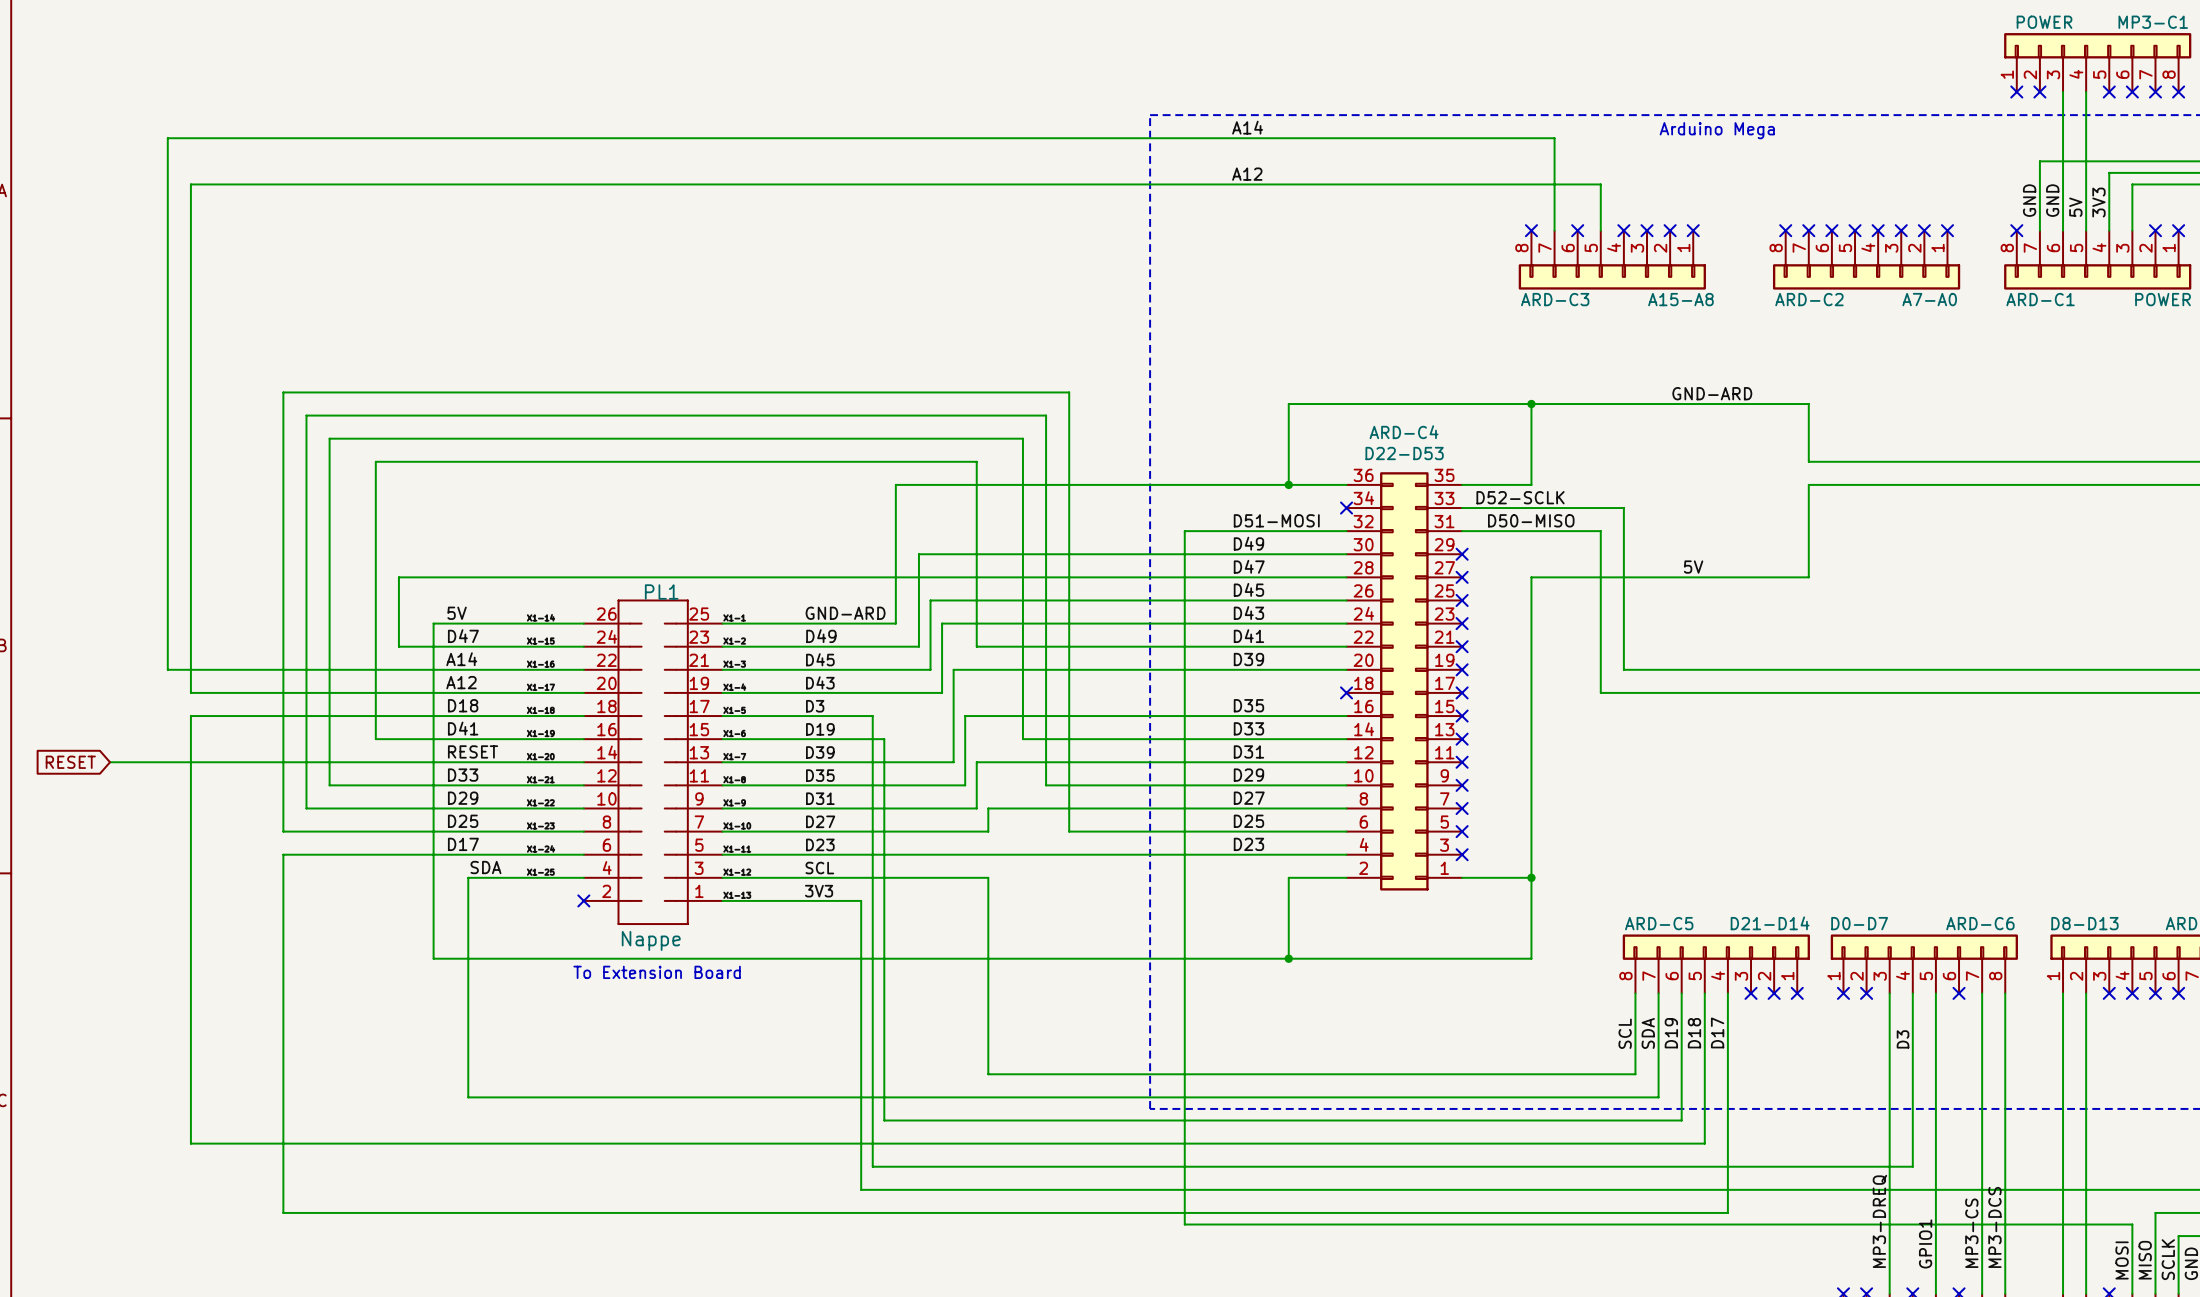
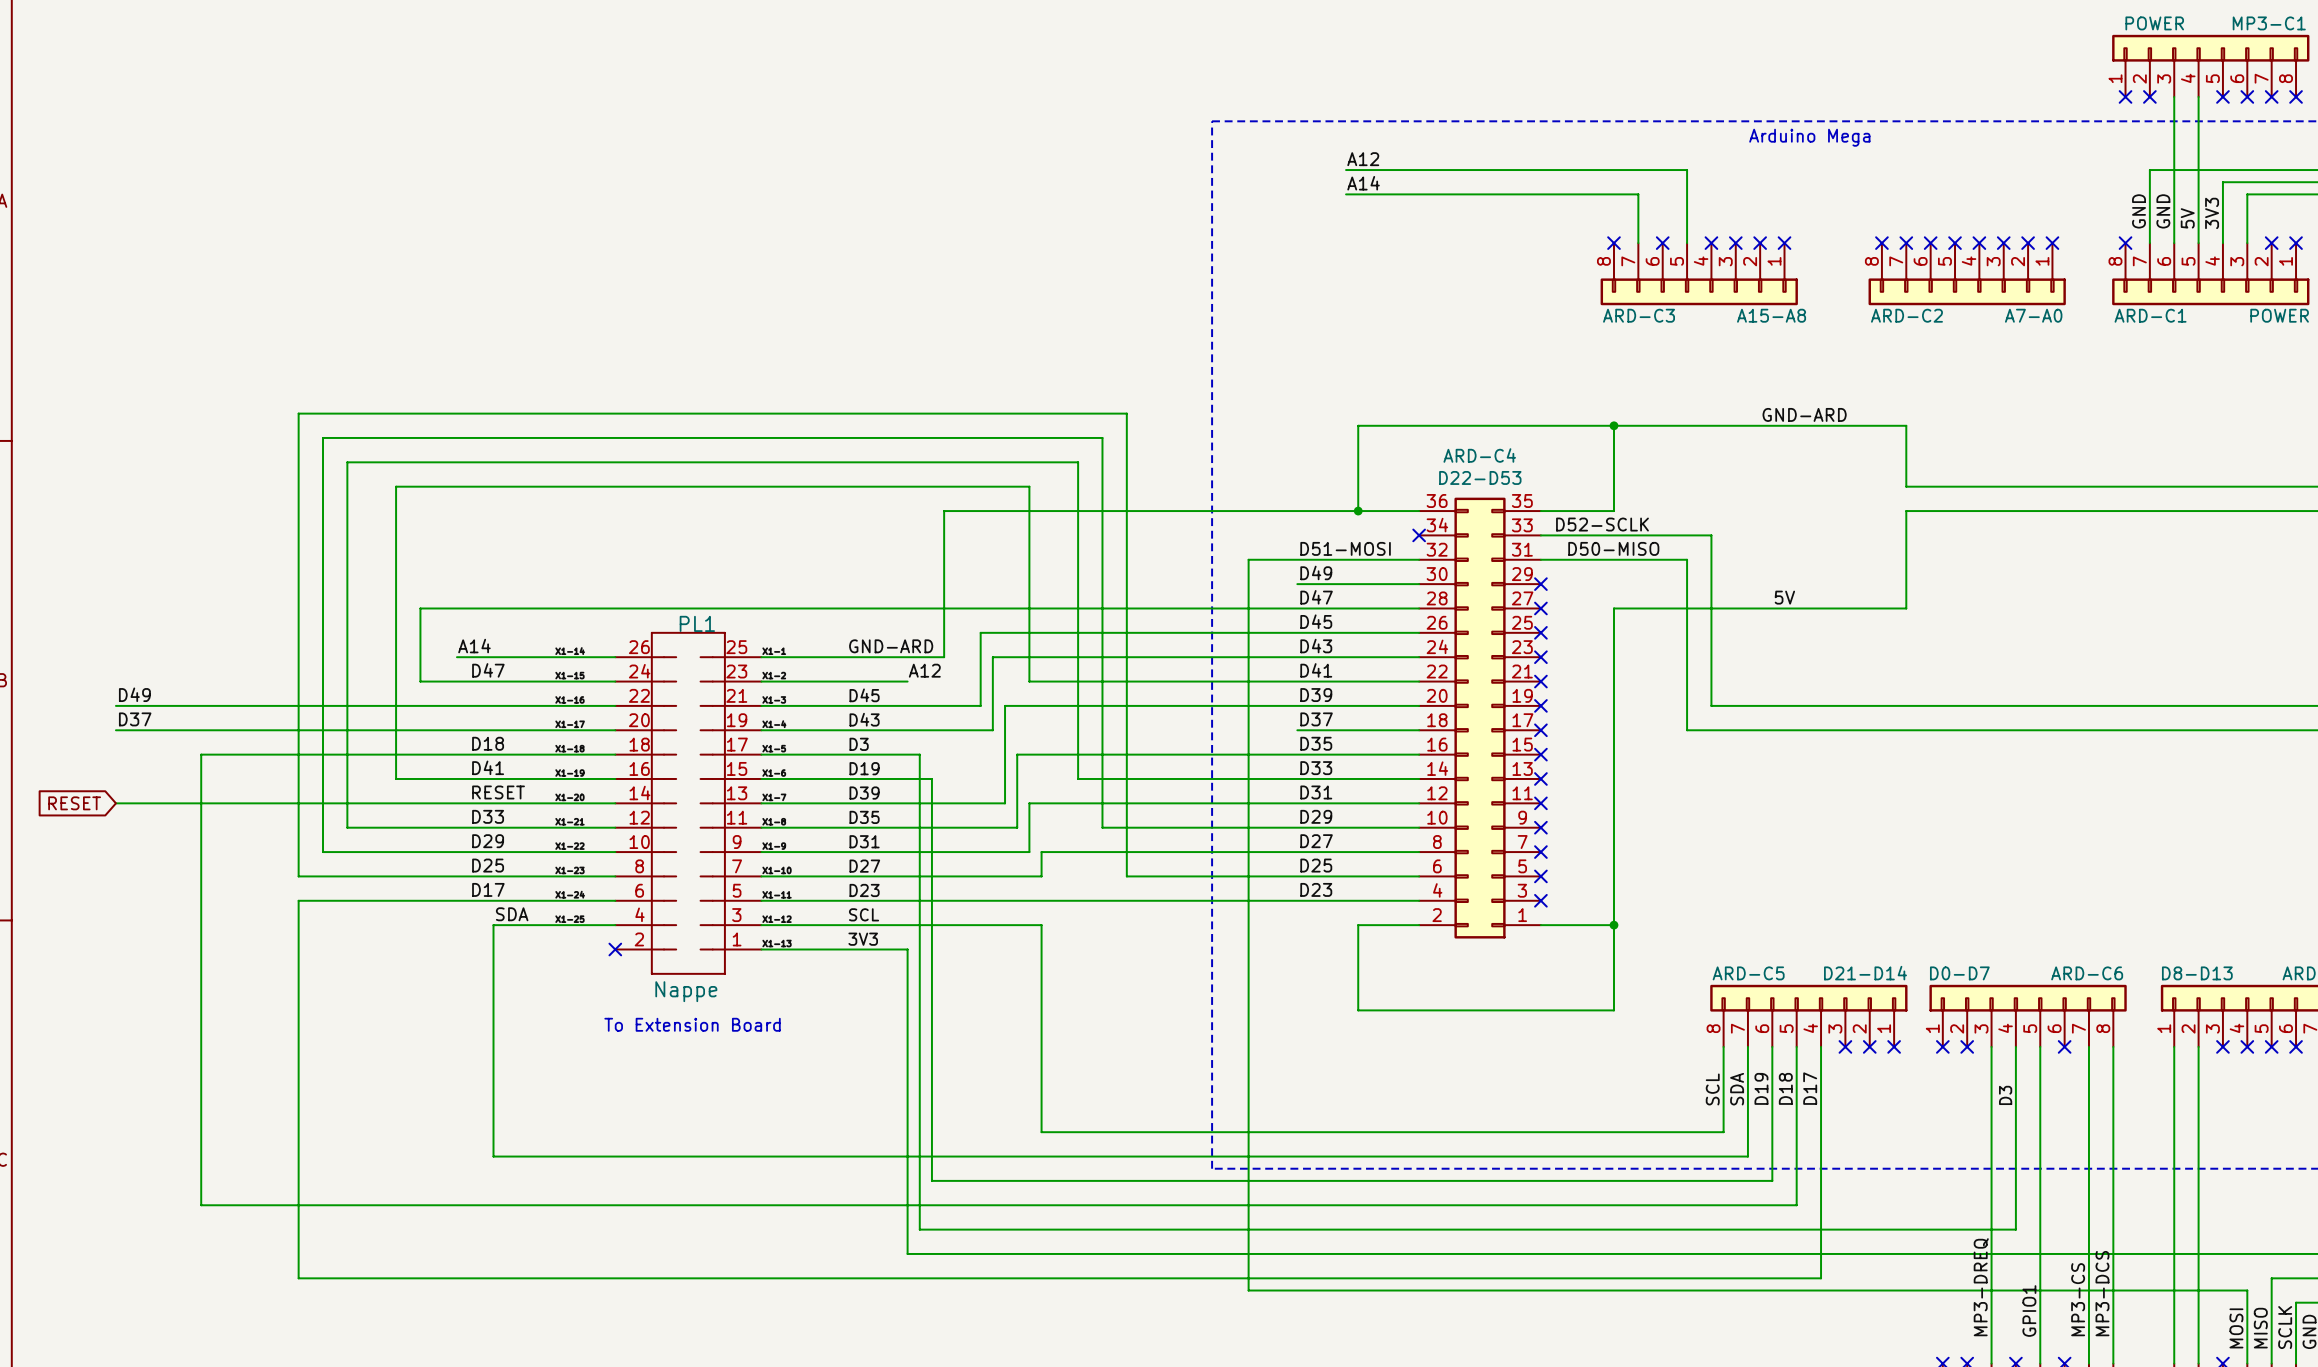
label position: A14 (1247, 127) -> A14 (1363, 183)
label position: A12 (1247, 174) -> A12 (1363, 159)
wire: (1277, 184) (190, 184) (190, 692) -> (115, 730) (201, 730)
wire: (1600, 184) (1554, 184) (1554, 138) (167, 138) (167, 669) -> (1687, 194) (1687, 170) (1346, 170)
wire: (1230, 554) (918, 554) (918, 646) (861, 646) -> none
label: 5V (457, 613) -> none
wire: (433, 623) (433, 958) (1288, 958) -> none
label: D49 (821, 636) -> none
label: none -> A12 (924, 670)
label: none -> D49 (134, 694)
label position: A14 (461, 659) -> A14 (474, 646)
wire: none -> (115, 705) (176, 705)
label: none -> D37 (135, 719)
label: A12 (461, 682) -> none
label: none -> D37 (1316, 719)
wire: none -> (1297, 730) (1419, 730)
no-connect mark: (1346, 692) -> none
junction: (1288, 958) -> none

